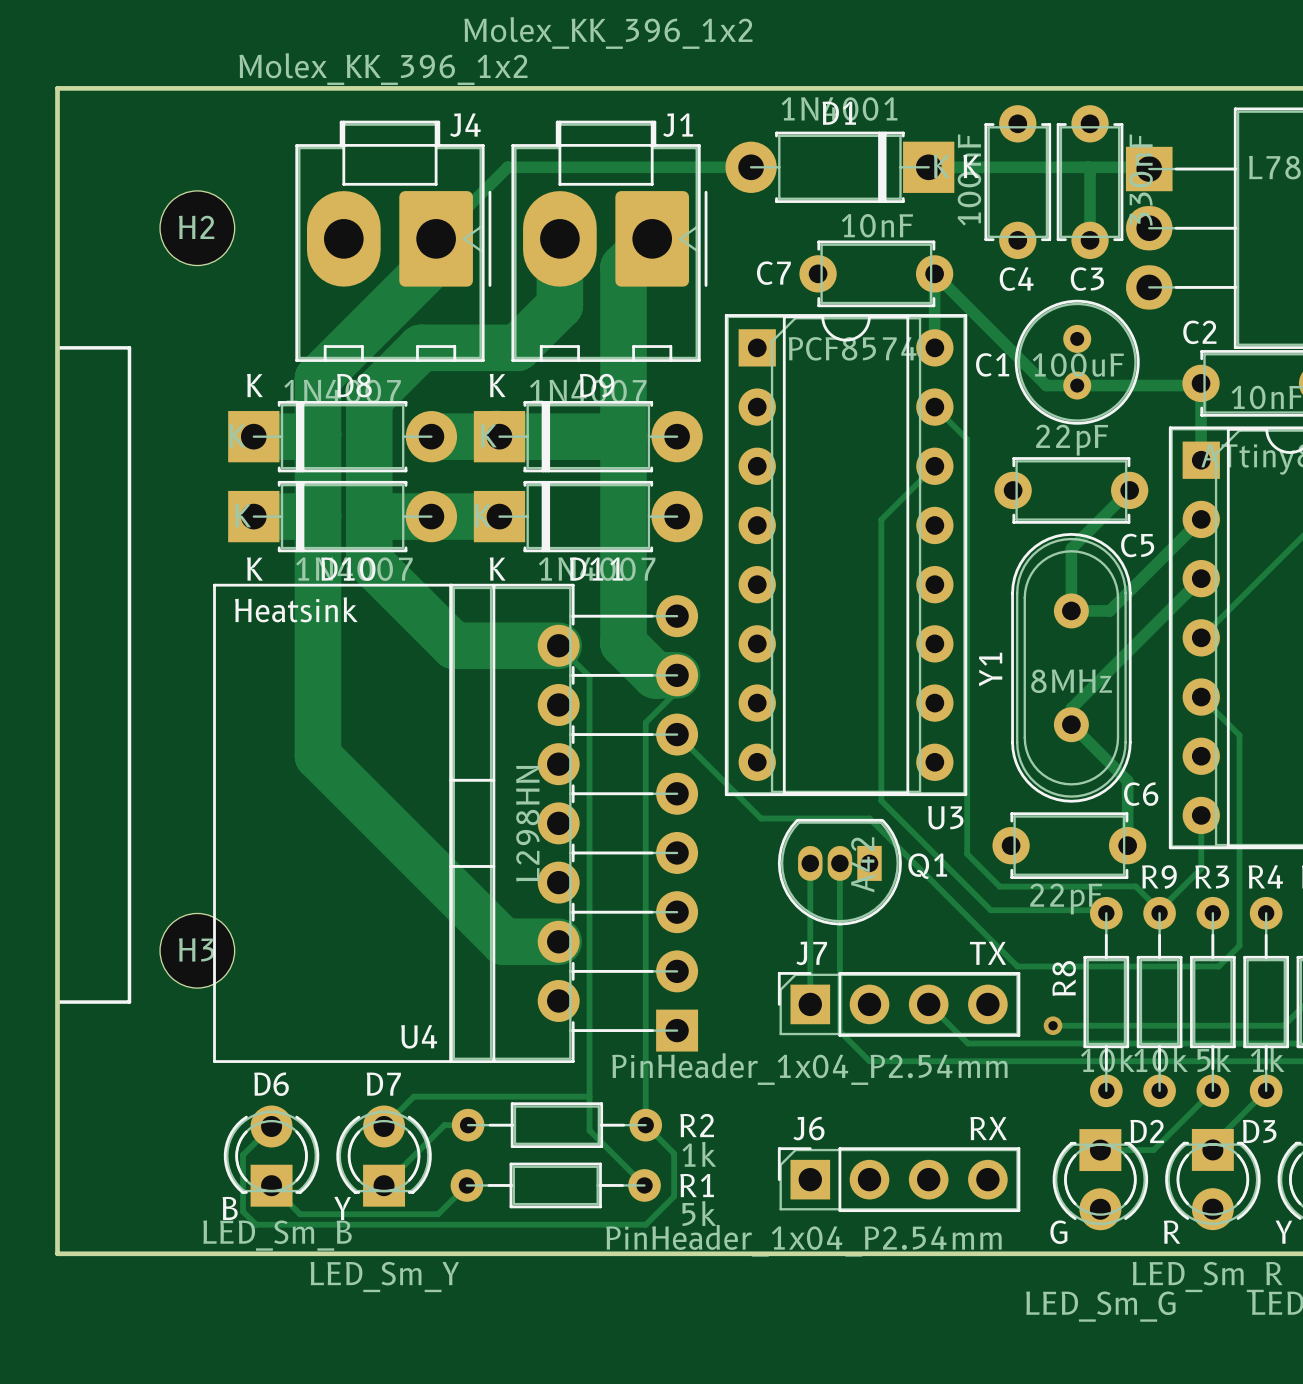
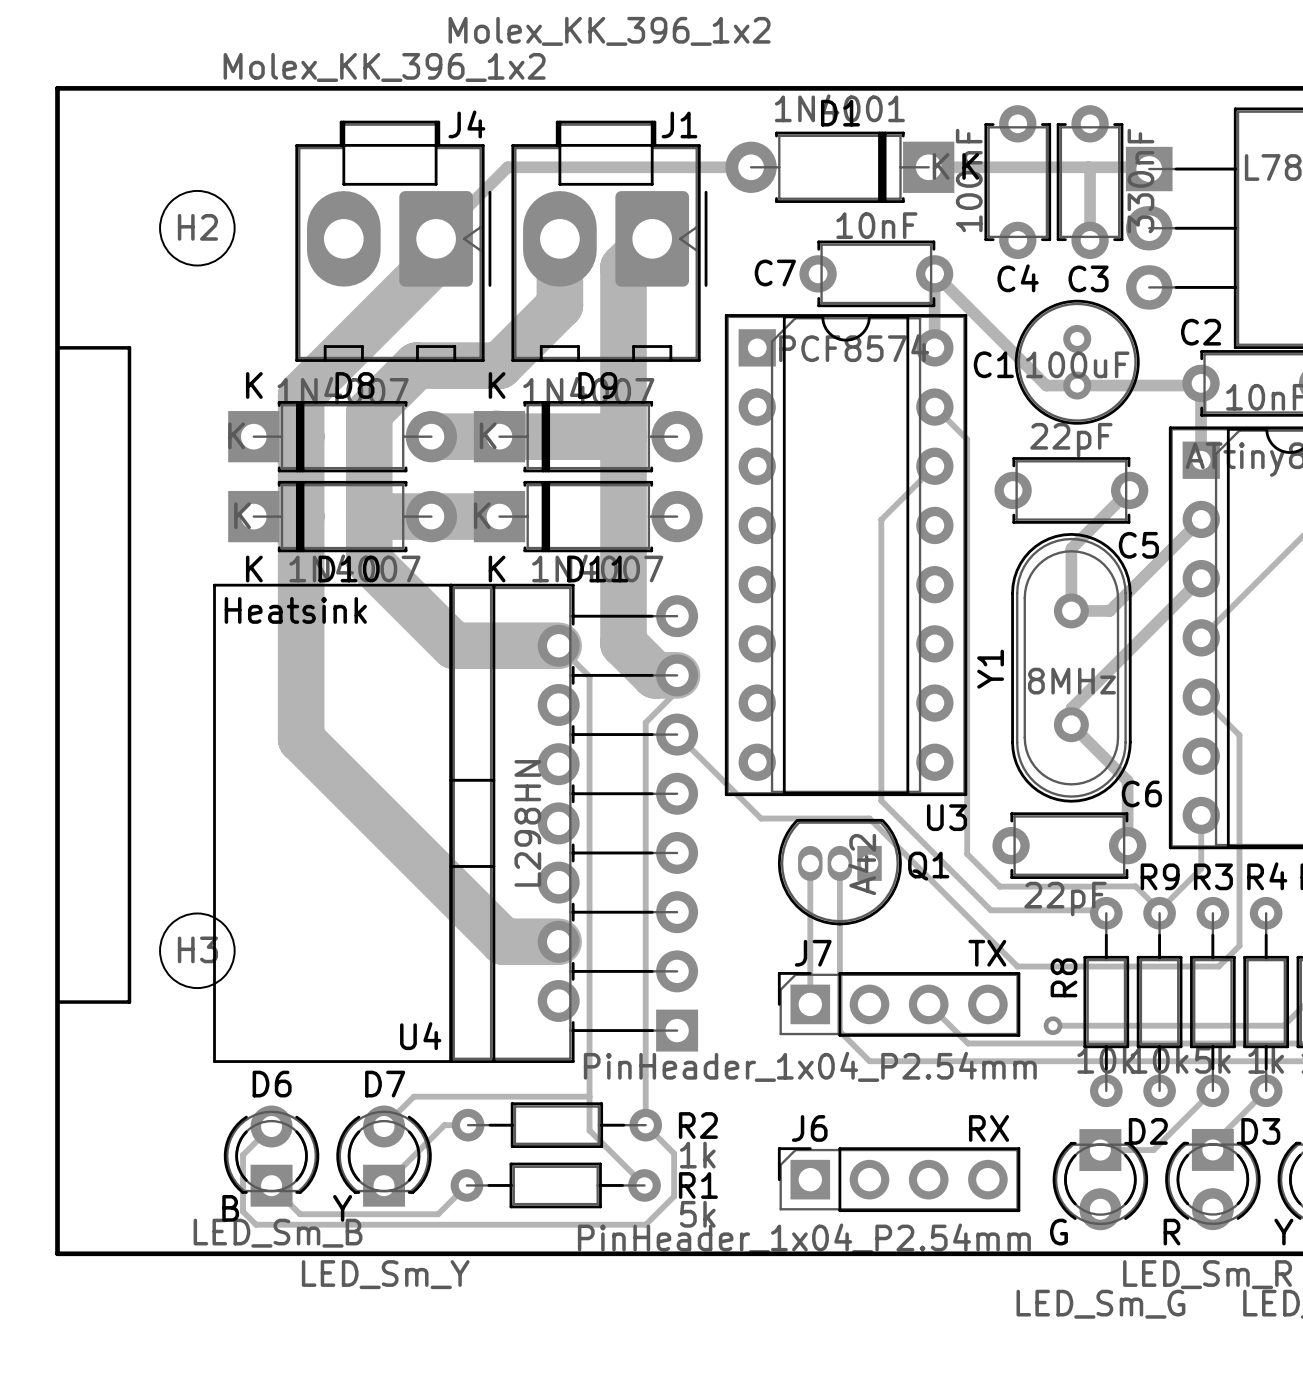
track: (517, 347) (421, 347) (369, 399) (369, 412) -> (517, 347) (499, 365) (416, 365) (369, 412)
track: (317, 378) (317, 756) -> (317, 378) (301, 395) (301, 739) (317, 756)

